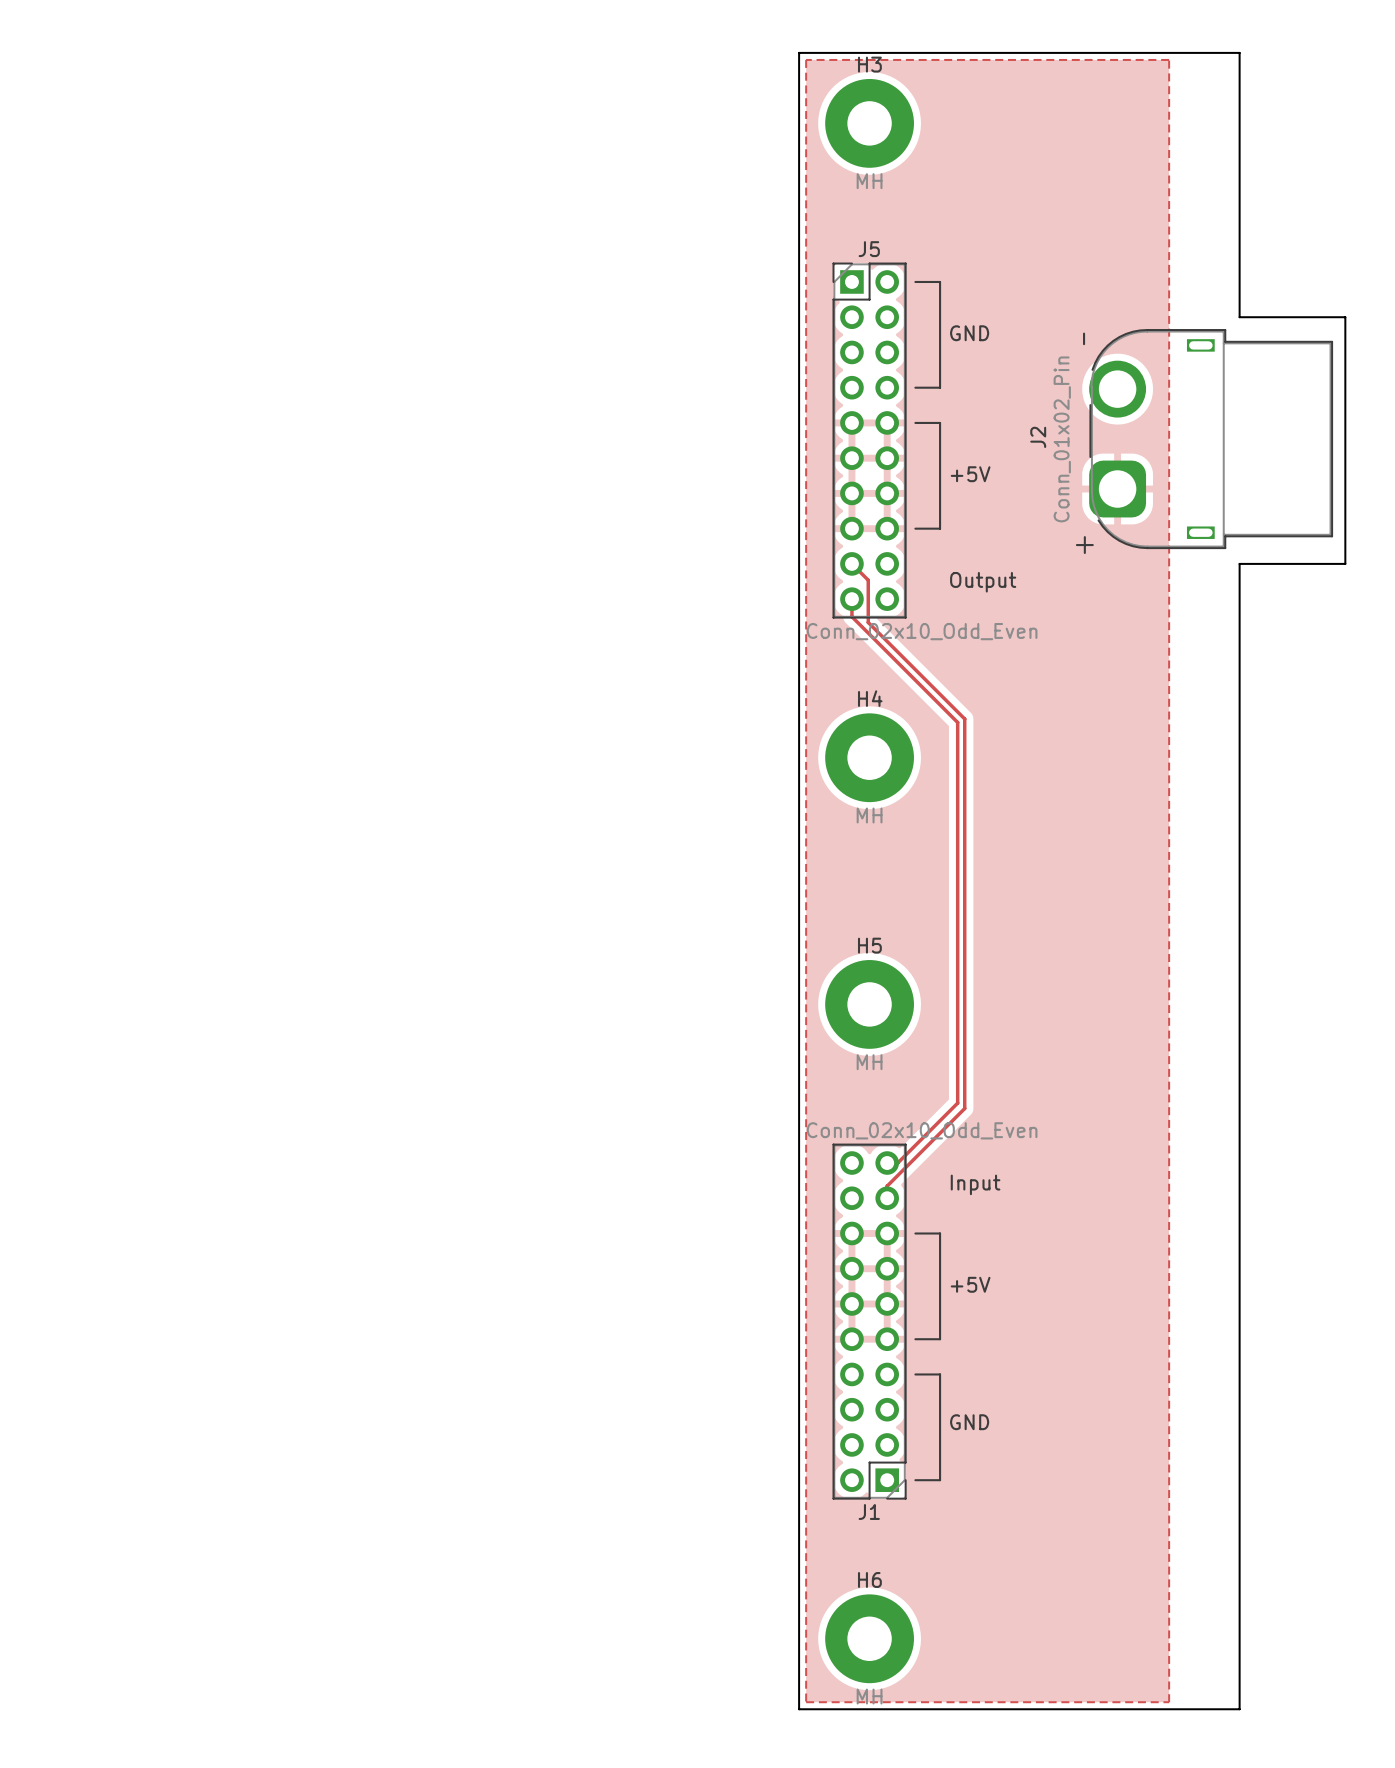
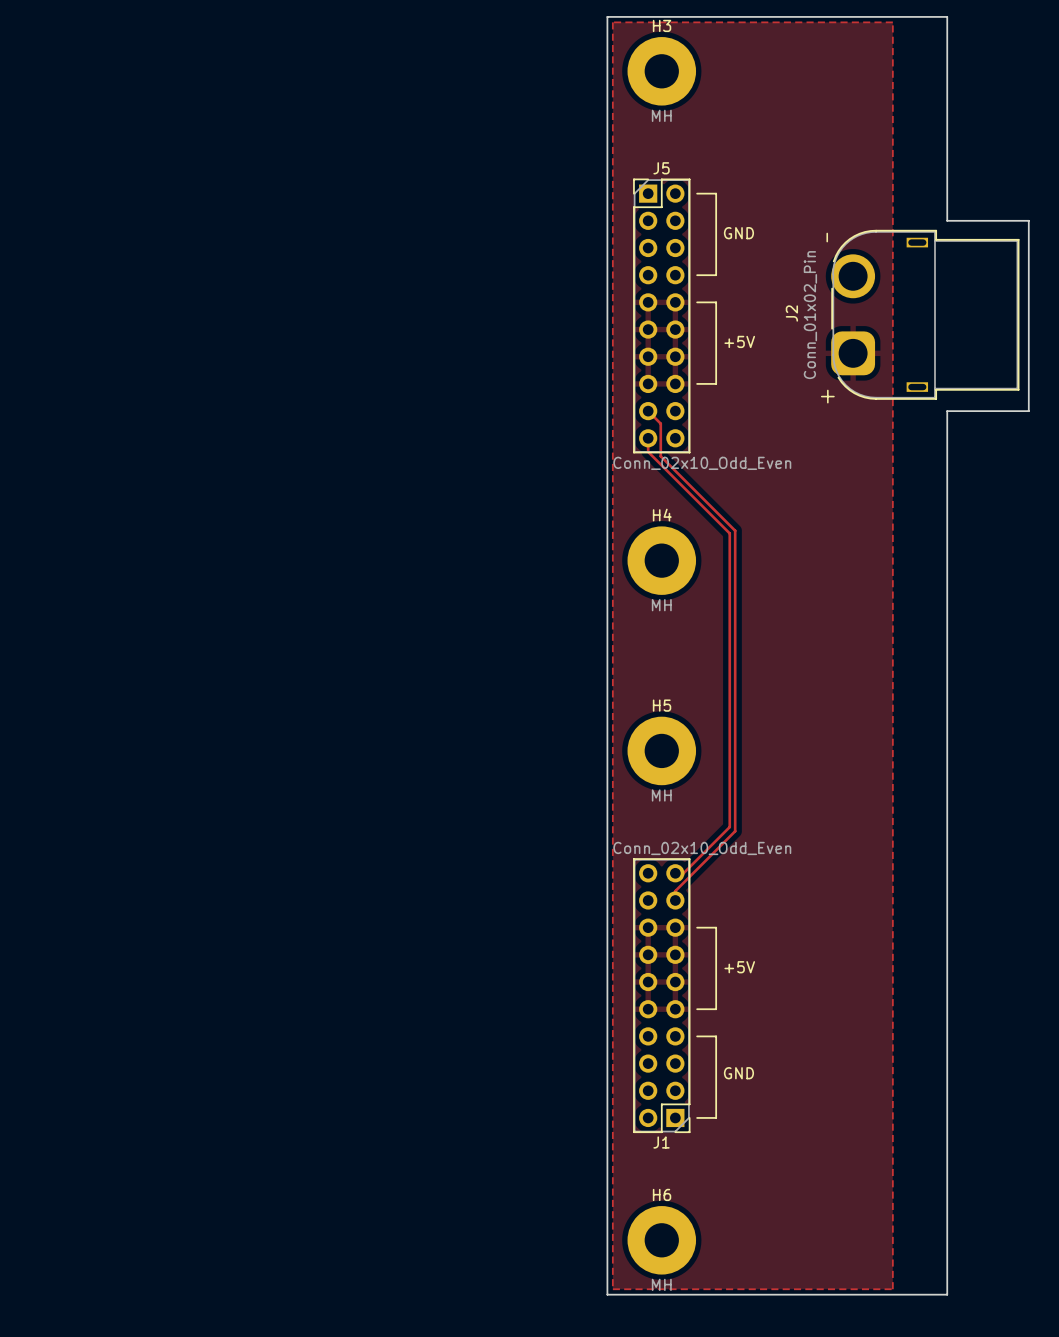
text: Output (983, 582) -> none
text: Input (975, 1184) -> none

